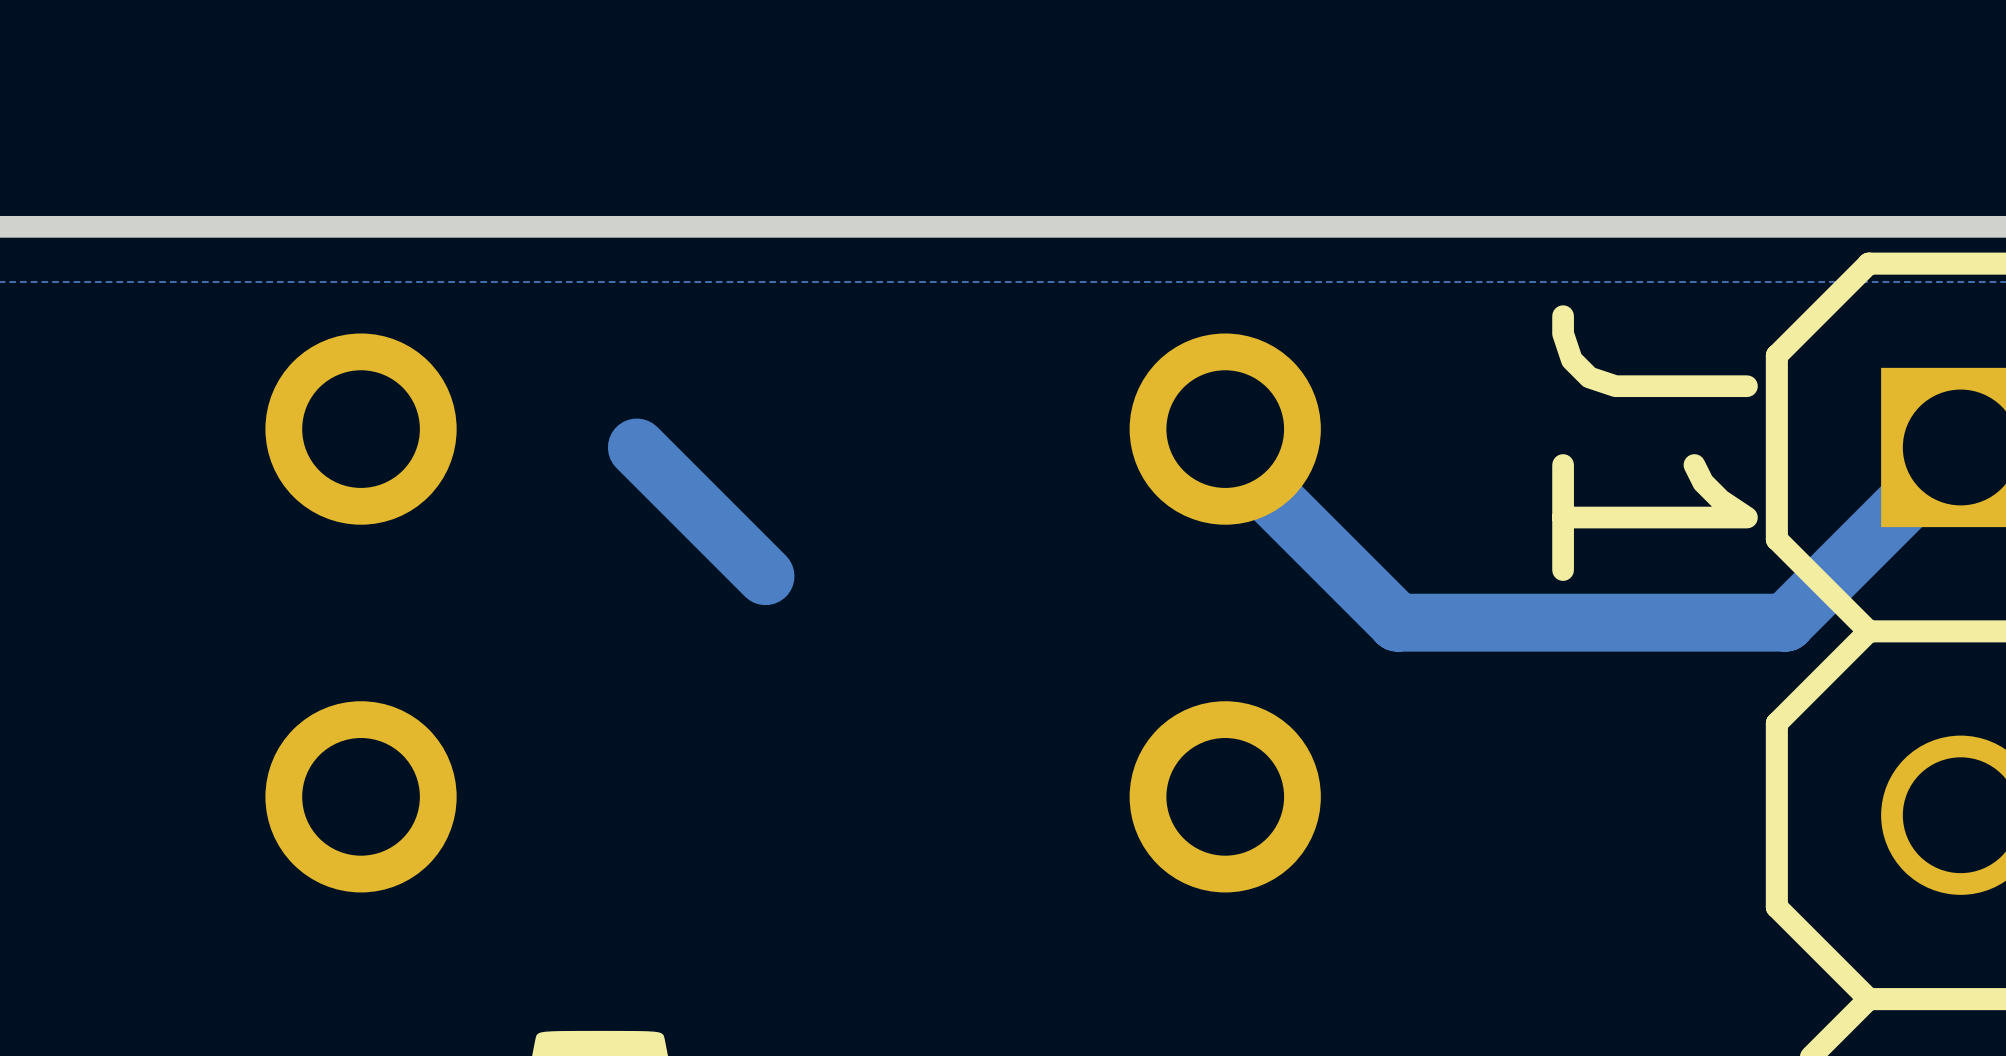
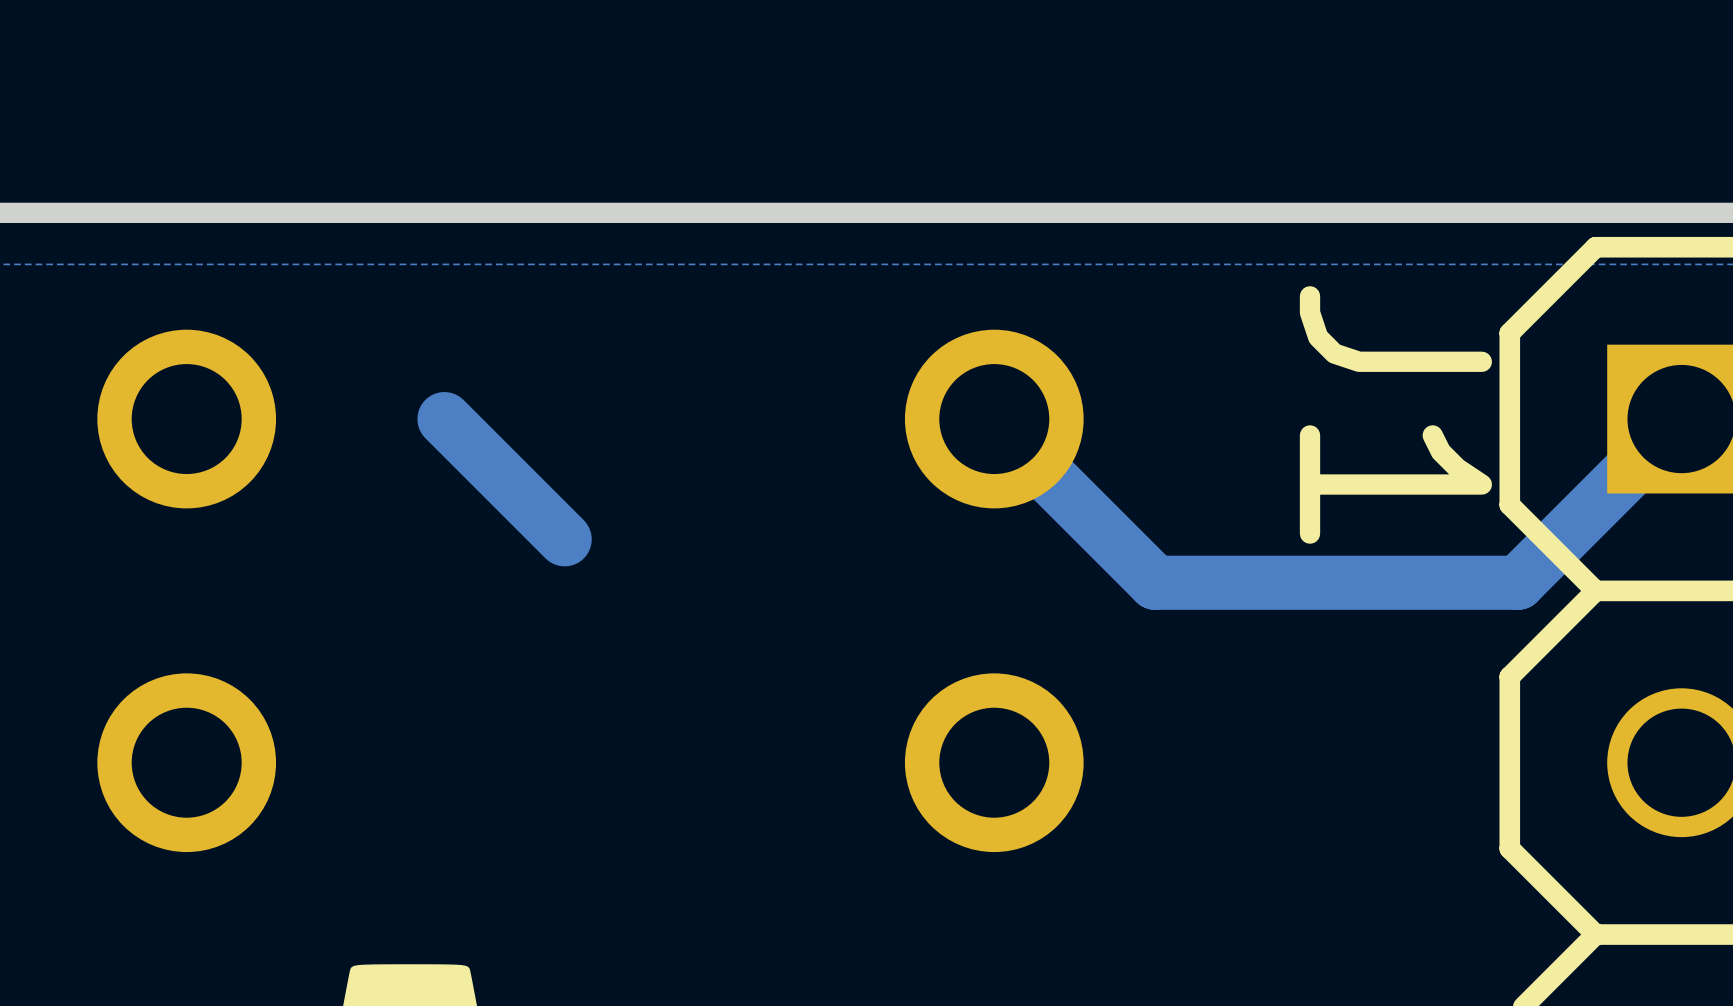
part position: (361, 612) -> (186, 590)
part position: (1225, 612) -> (994, 590)

